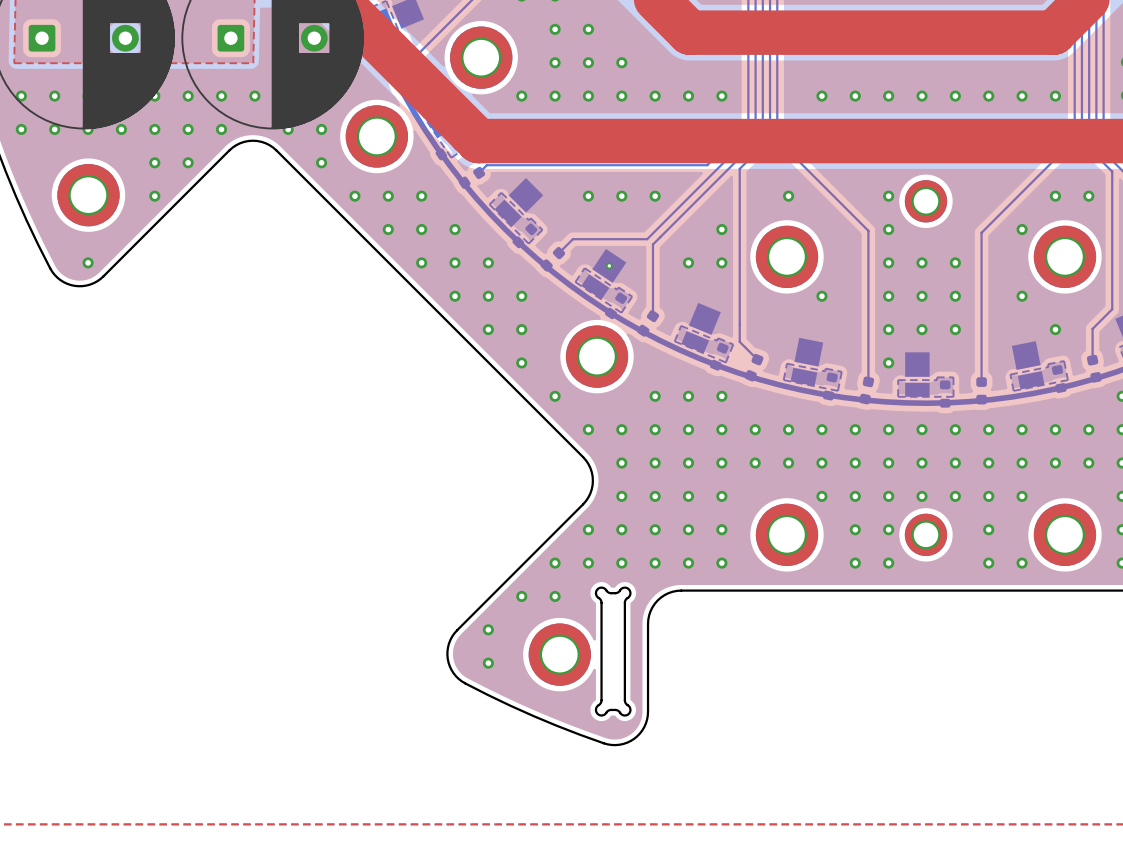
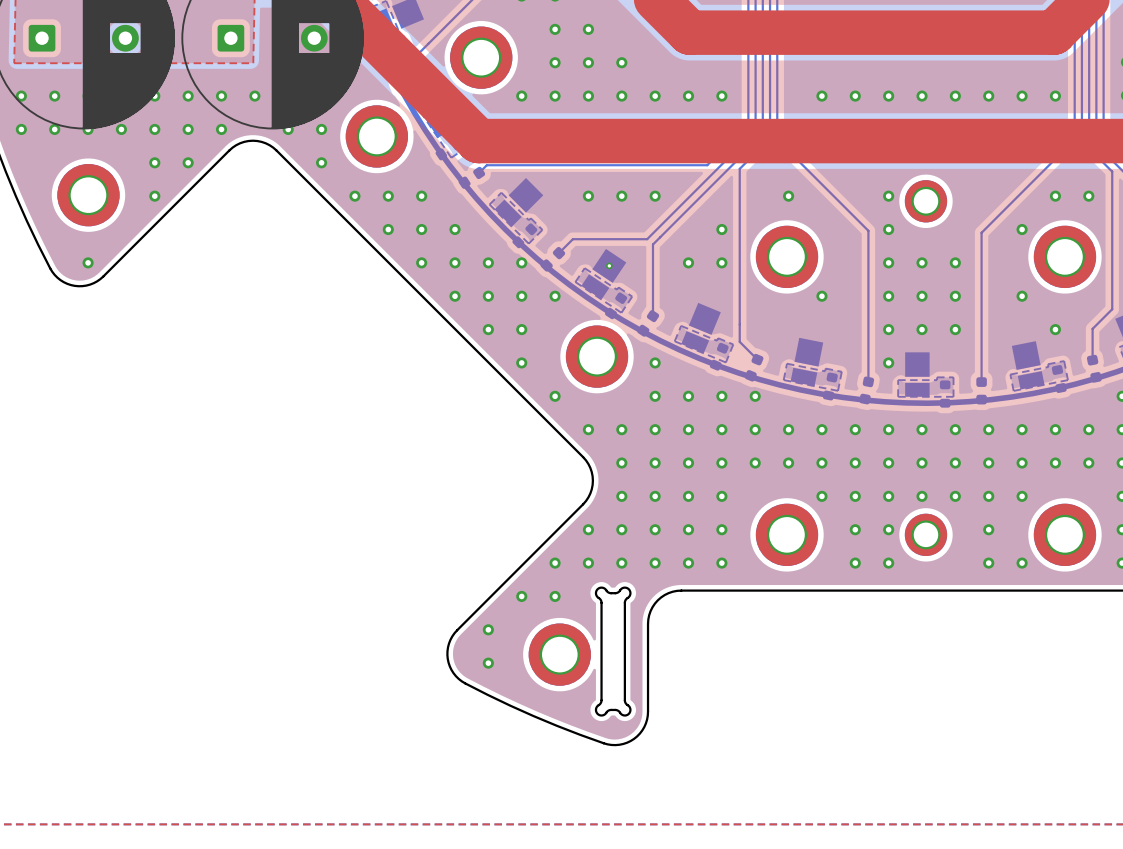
via: none -> (521, 262)
via: none -> (555, 296)
via: none -> (655, 362)
via: none -> (755, 396)

